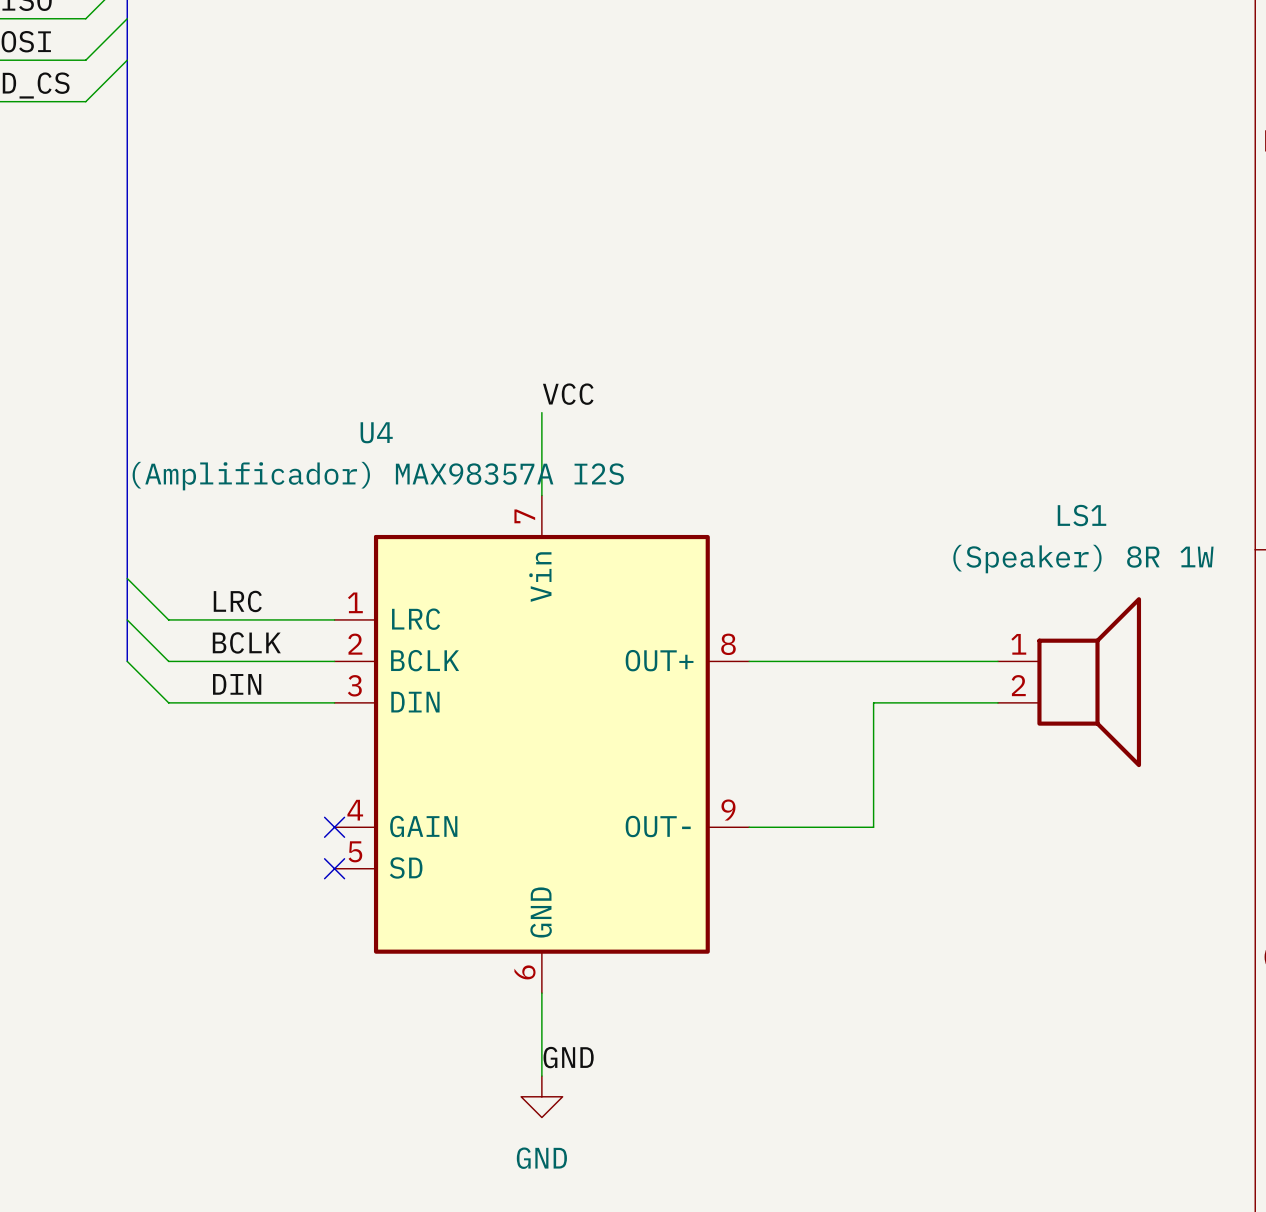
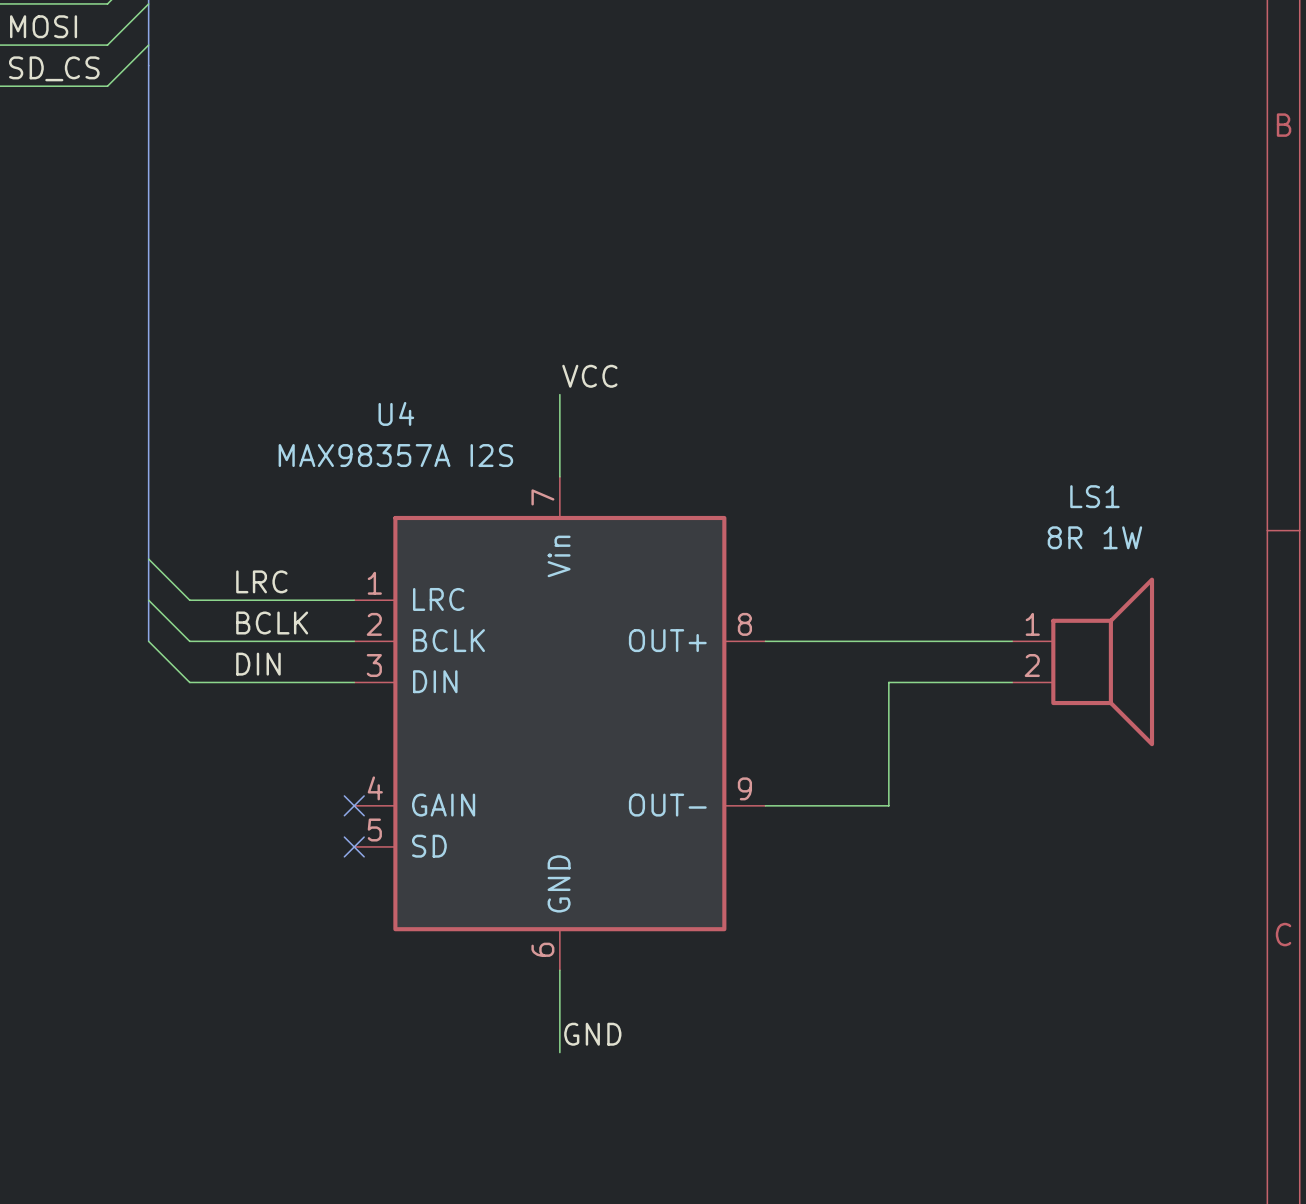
U4 value: (Amplificador) MAX98357A I2S (378, 476) -> MAX98357A I2S (395, 455)
LS1 value: (Speaker) 8R 1W (1083, 559) -> 8R 1W (1094, 537)
power symbol: GND (541, 1096) -> none

